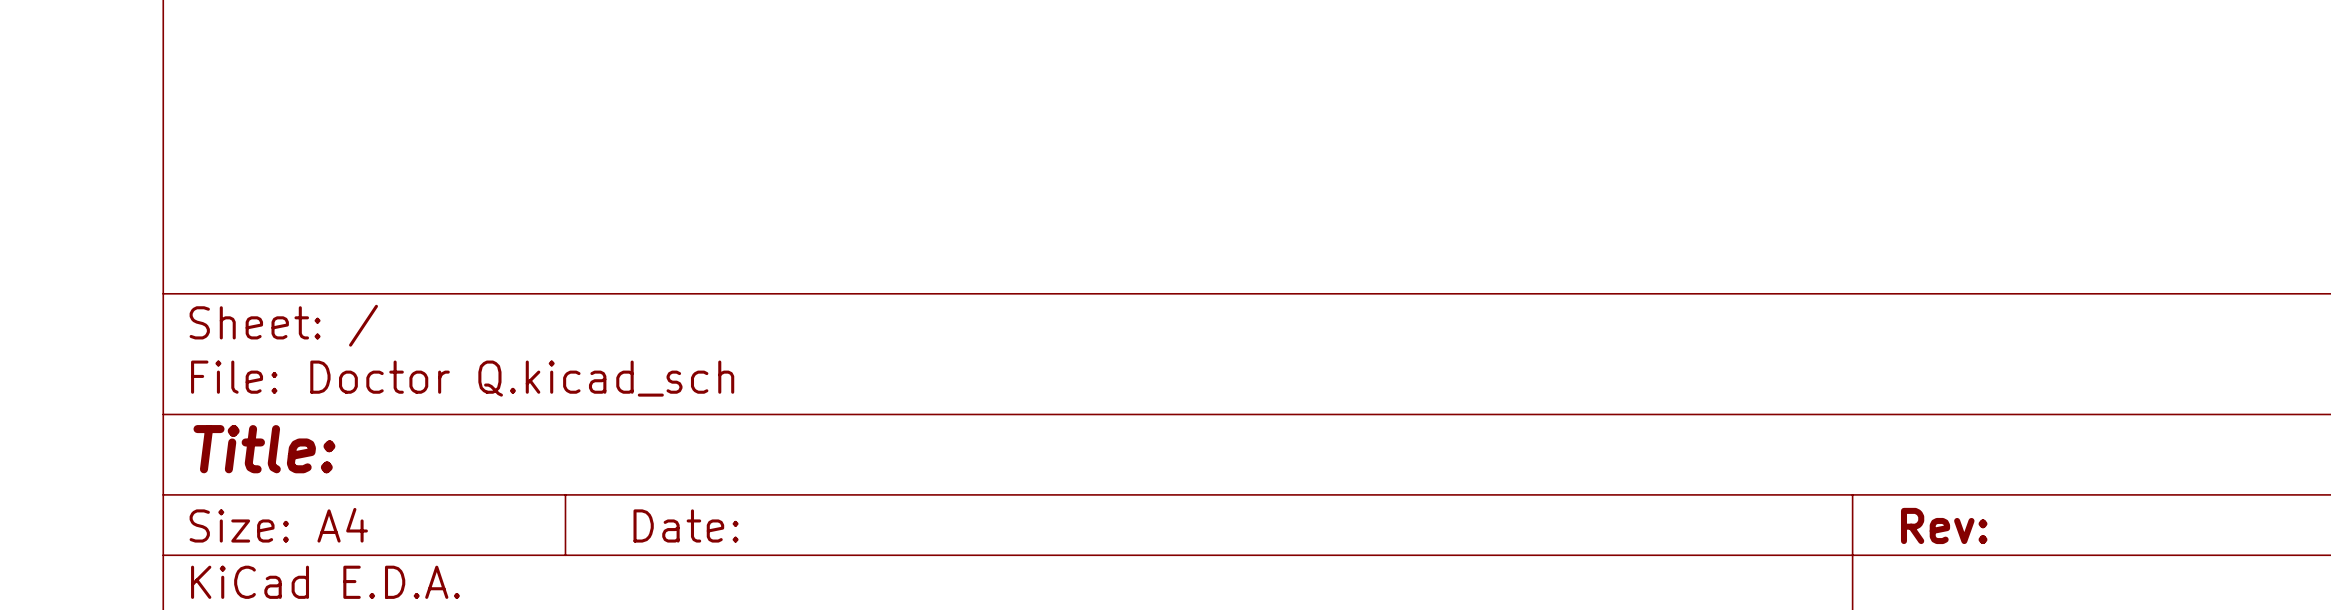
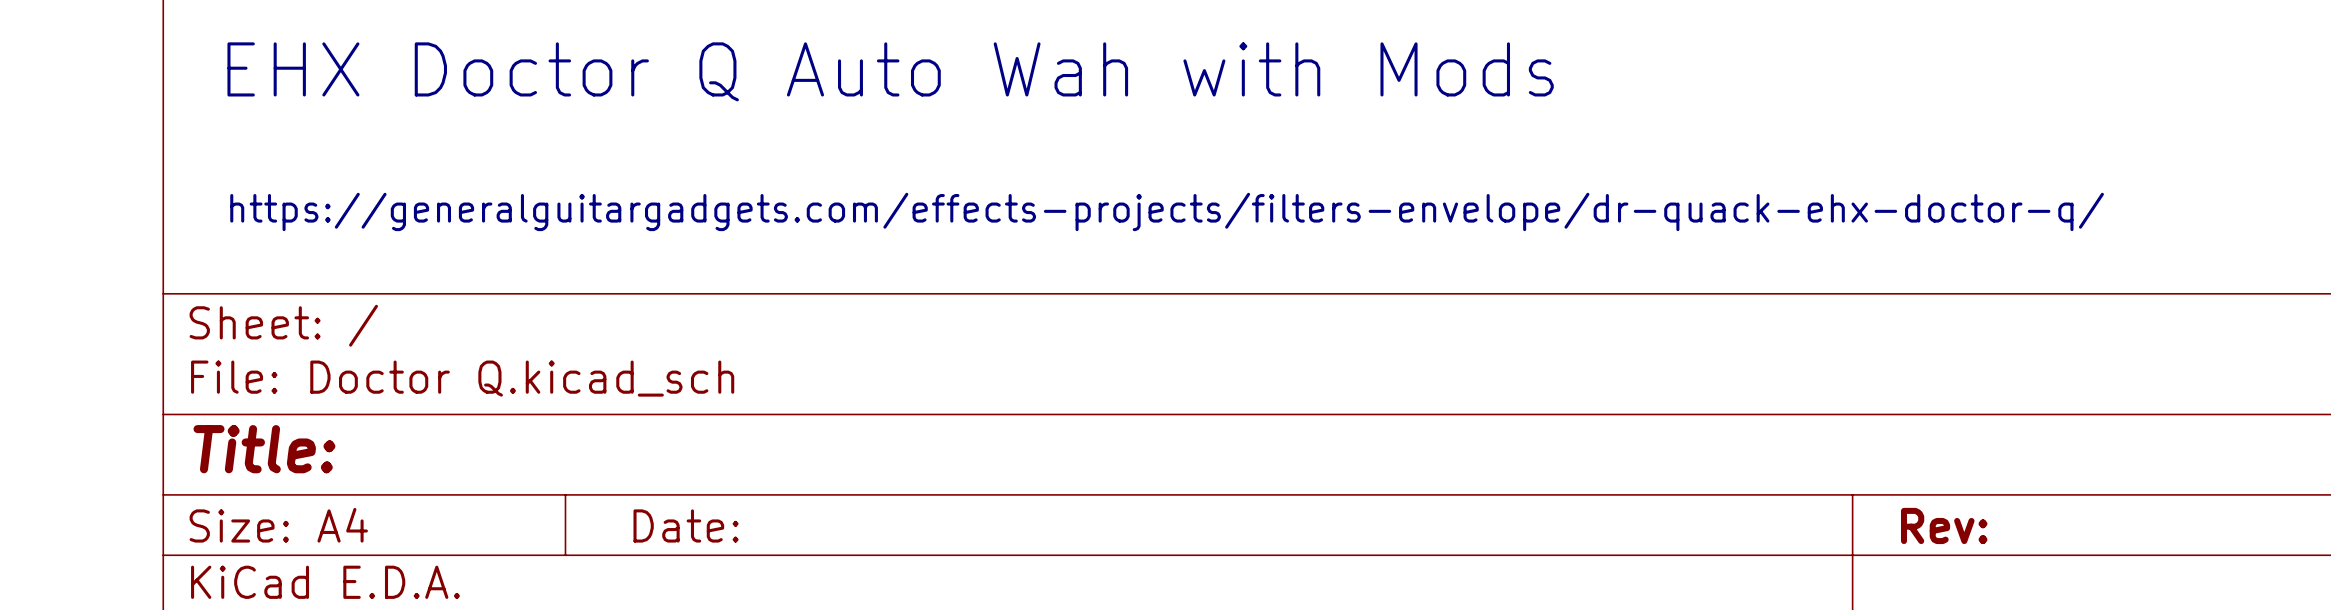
text: none -> EHX Doctor Q Auto Wah with Mods (890, 71)
text: none -> https://generalguitargadgets.com/effects-projects/filters-envelope/dr-quack-ehx-doctor-q/ (1167, 211)

